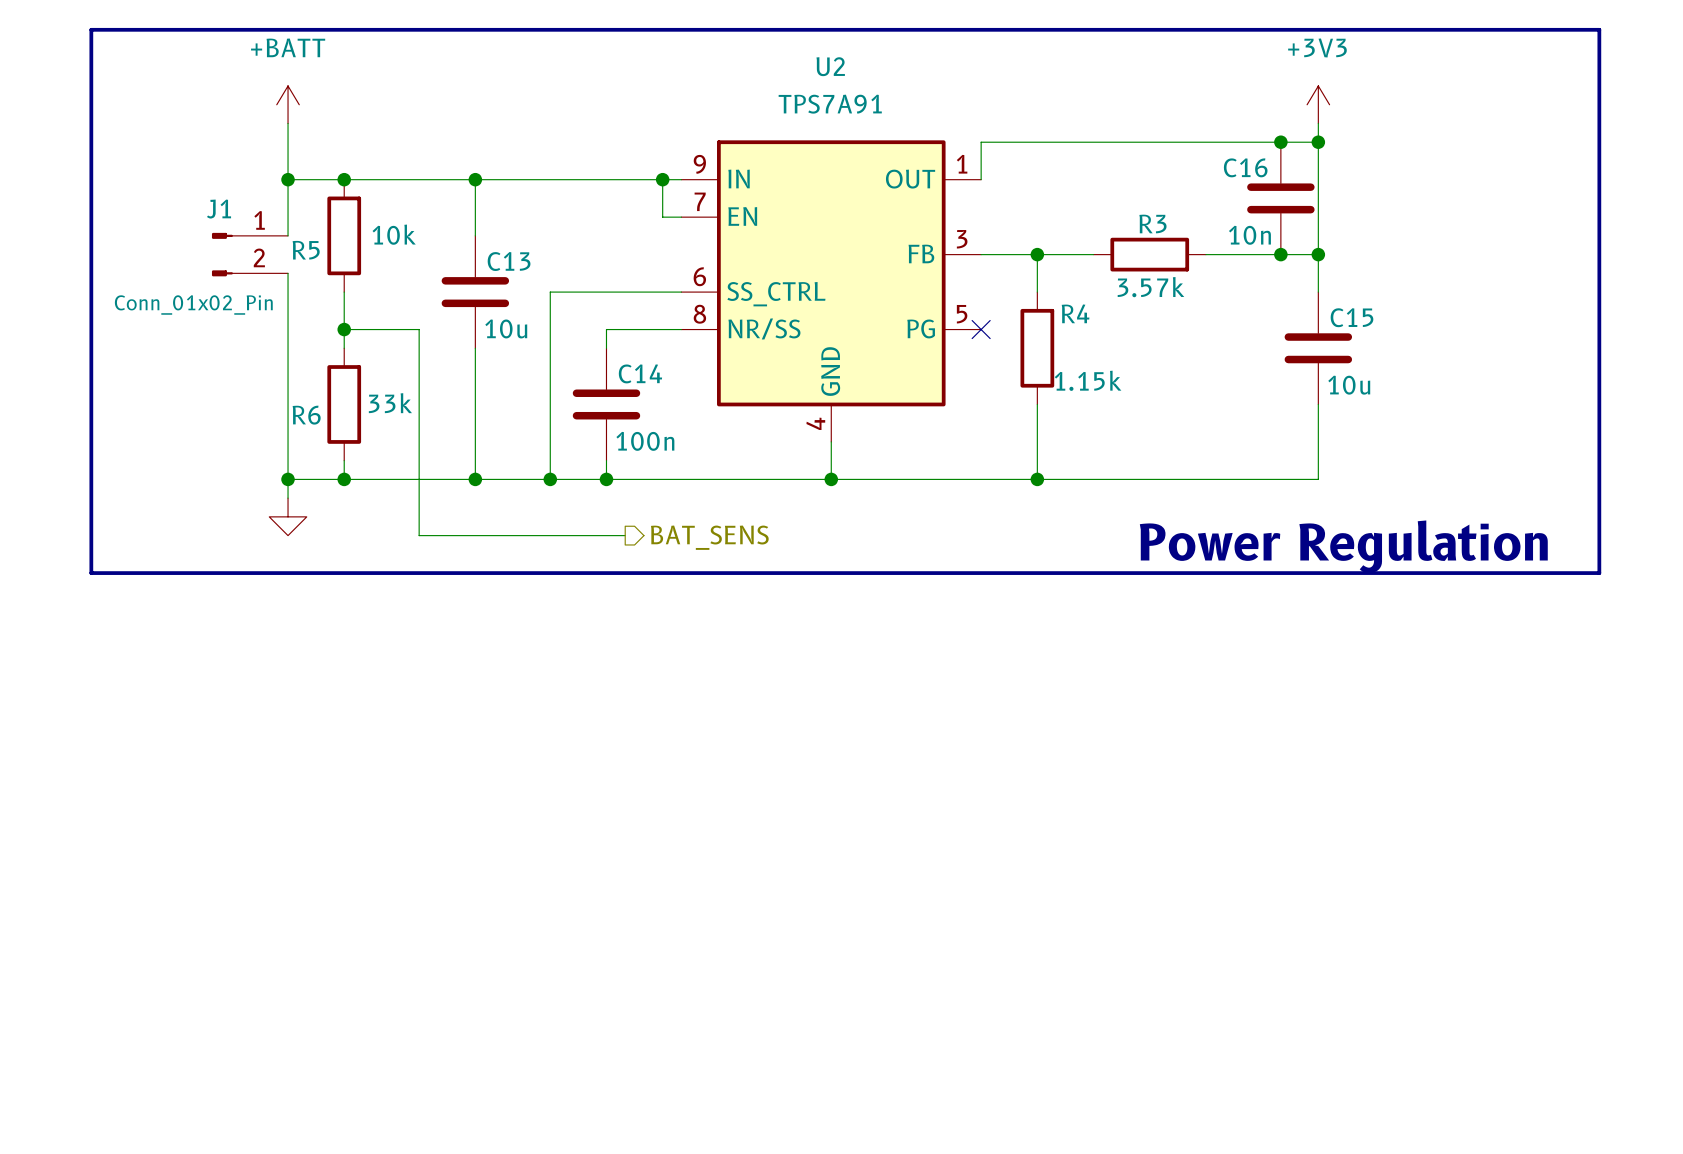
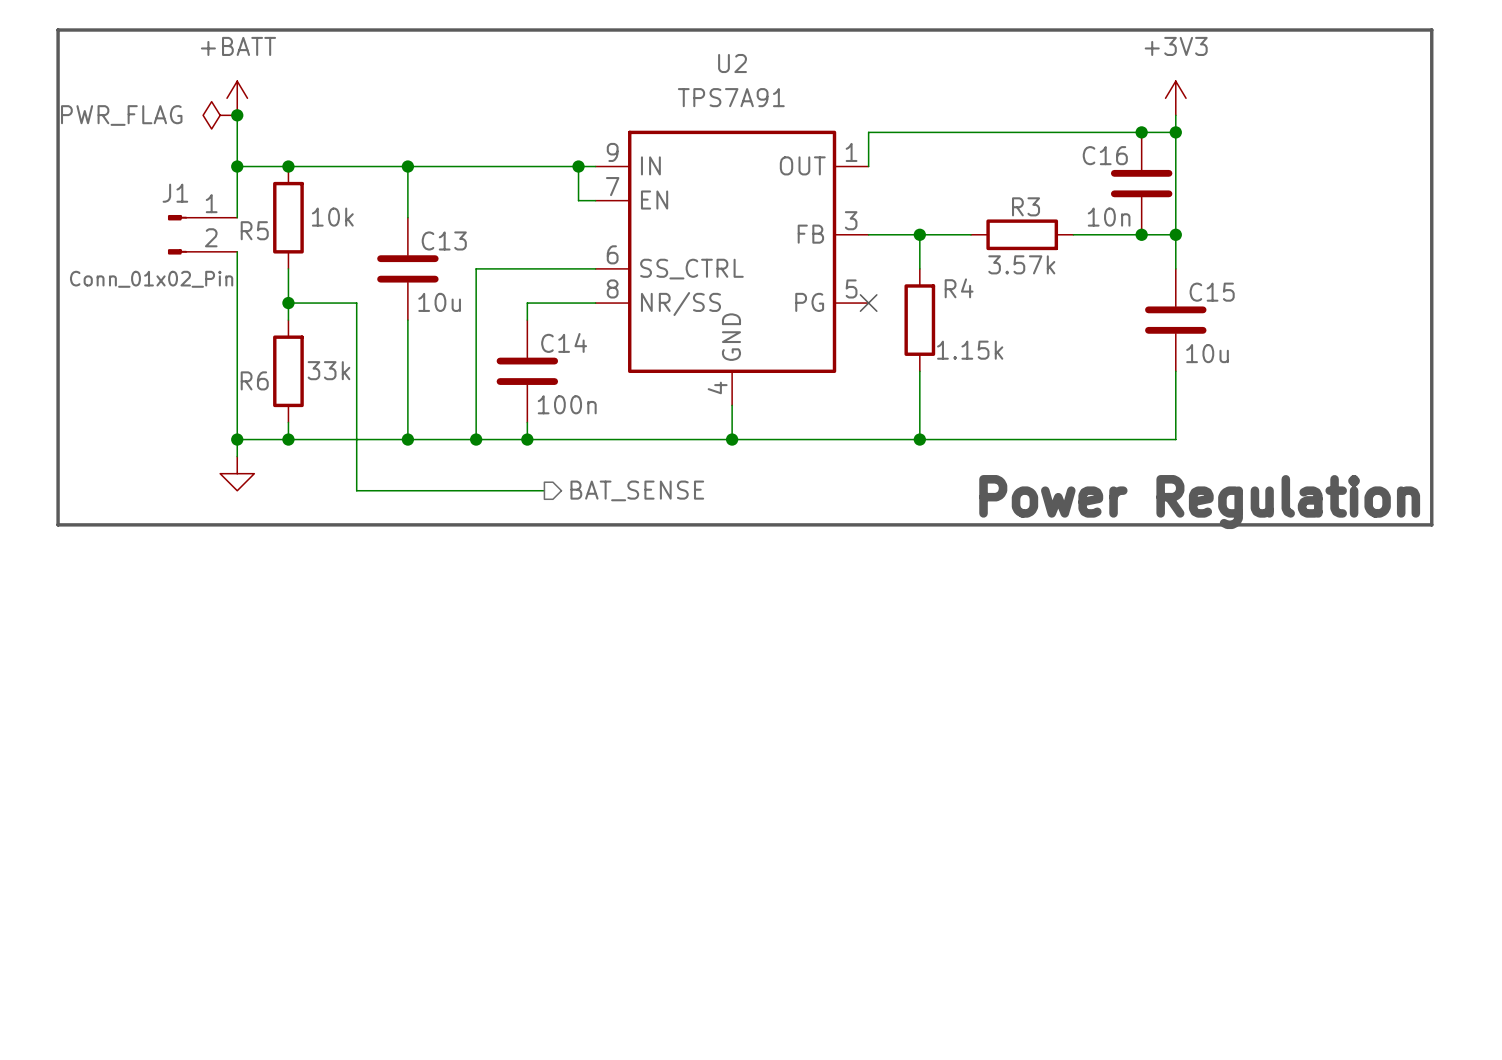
power symbol: none -> PWR_FLAG (220, 115)
junction: none -> (237, 115)
hierarchical label: BAT_SENS (709, 537) -> BAT_SENSE (637, 490)

